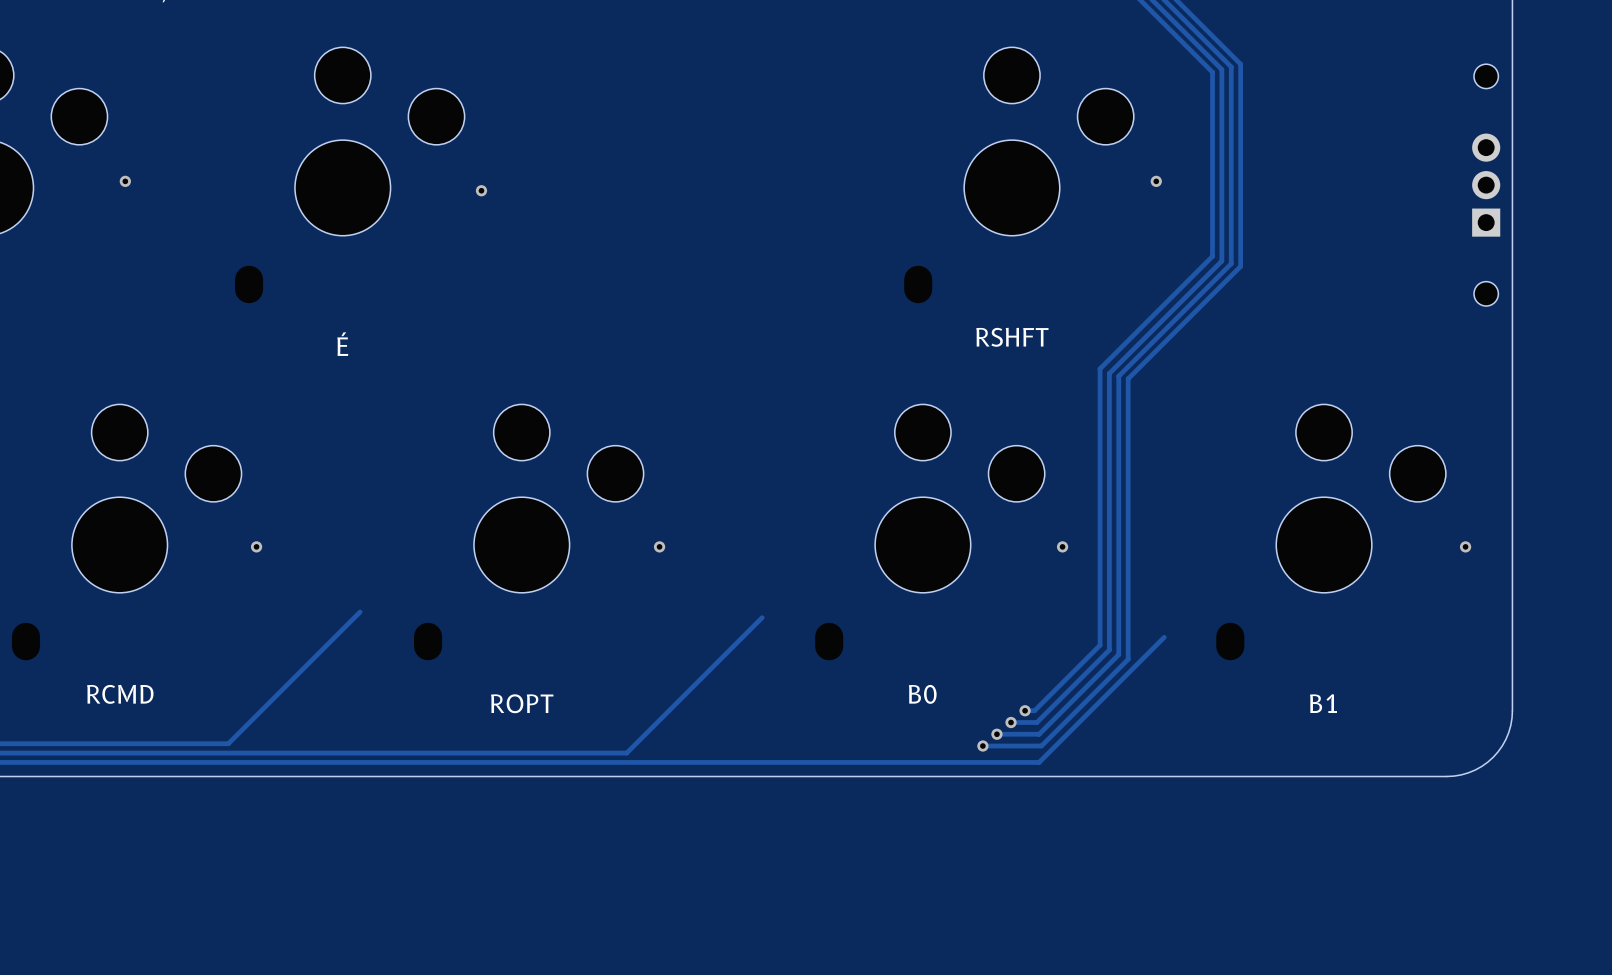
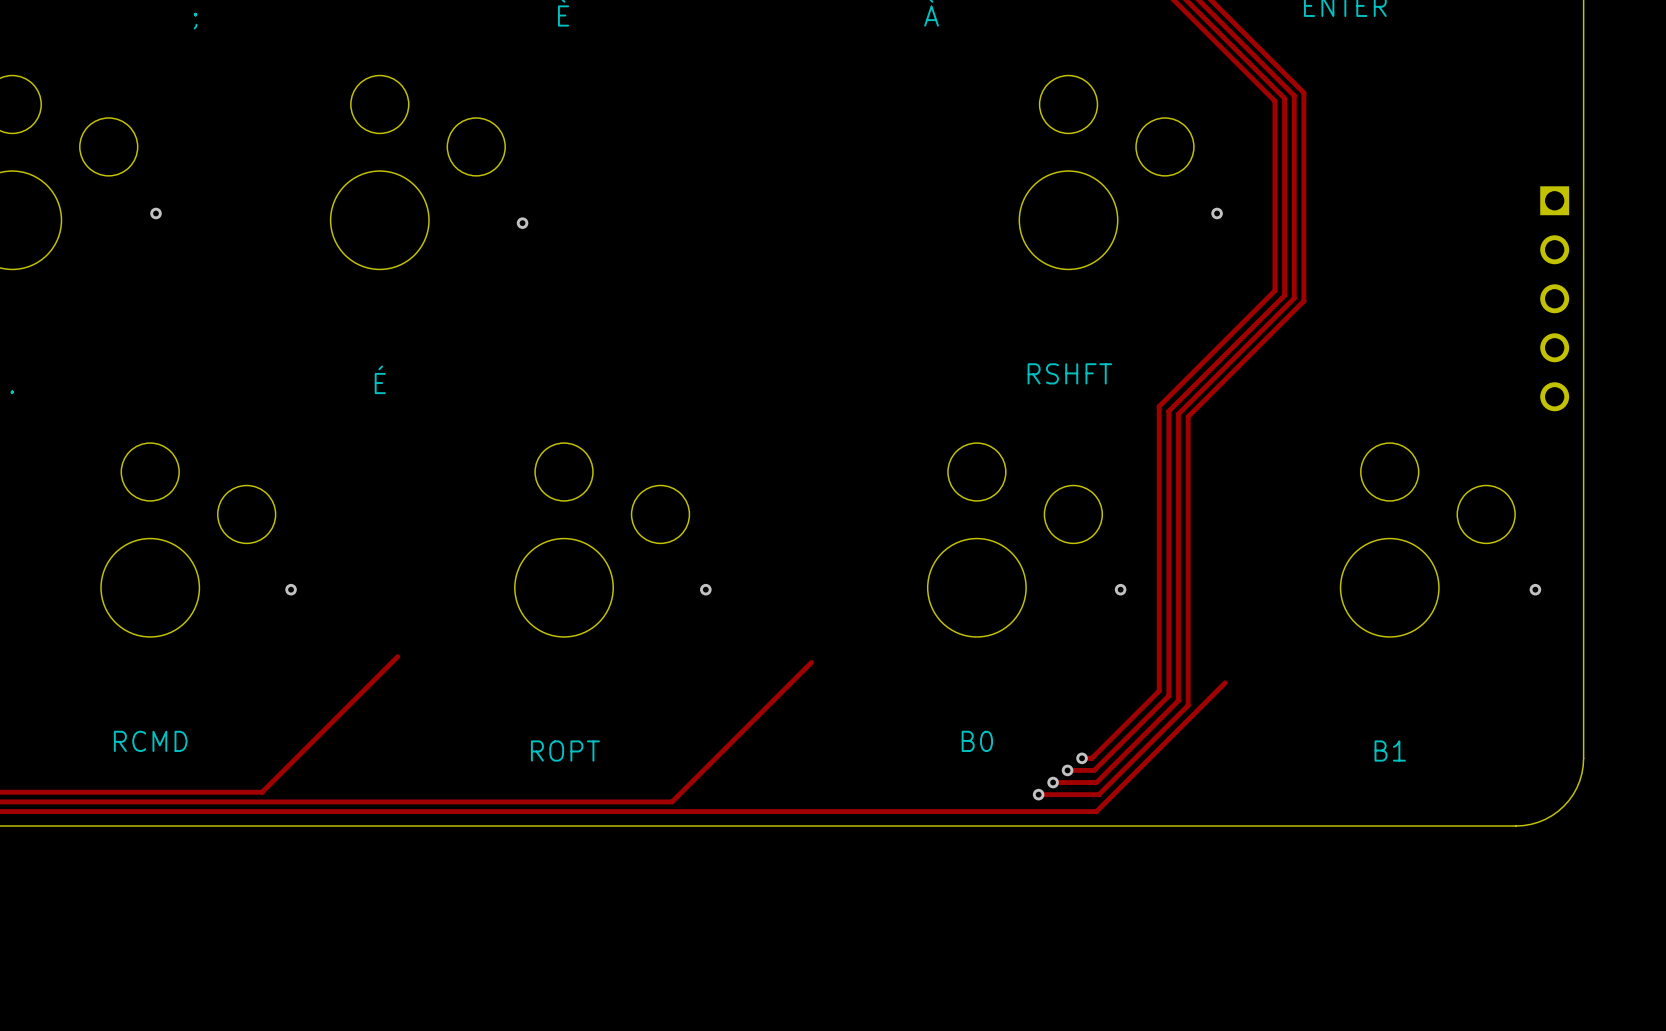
part: (1486, 185) -> none
part: none -> (1554, 298)

